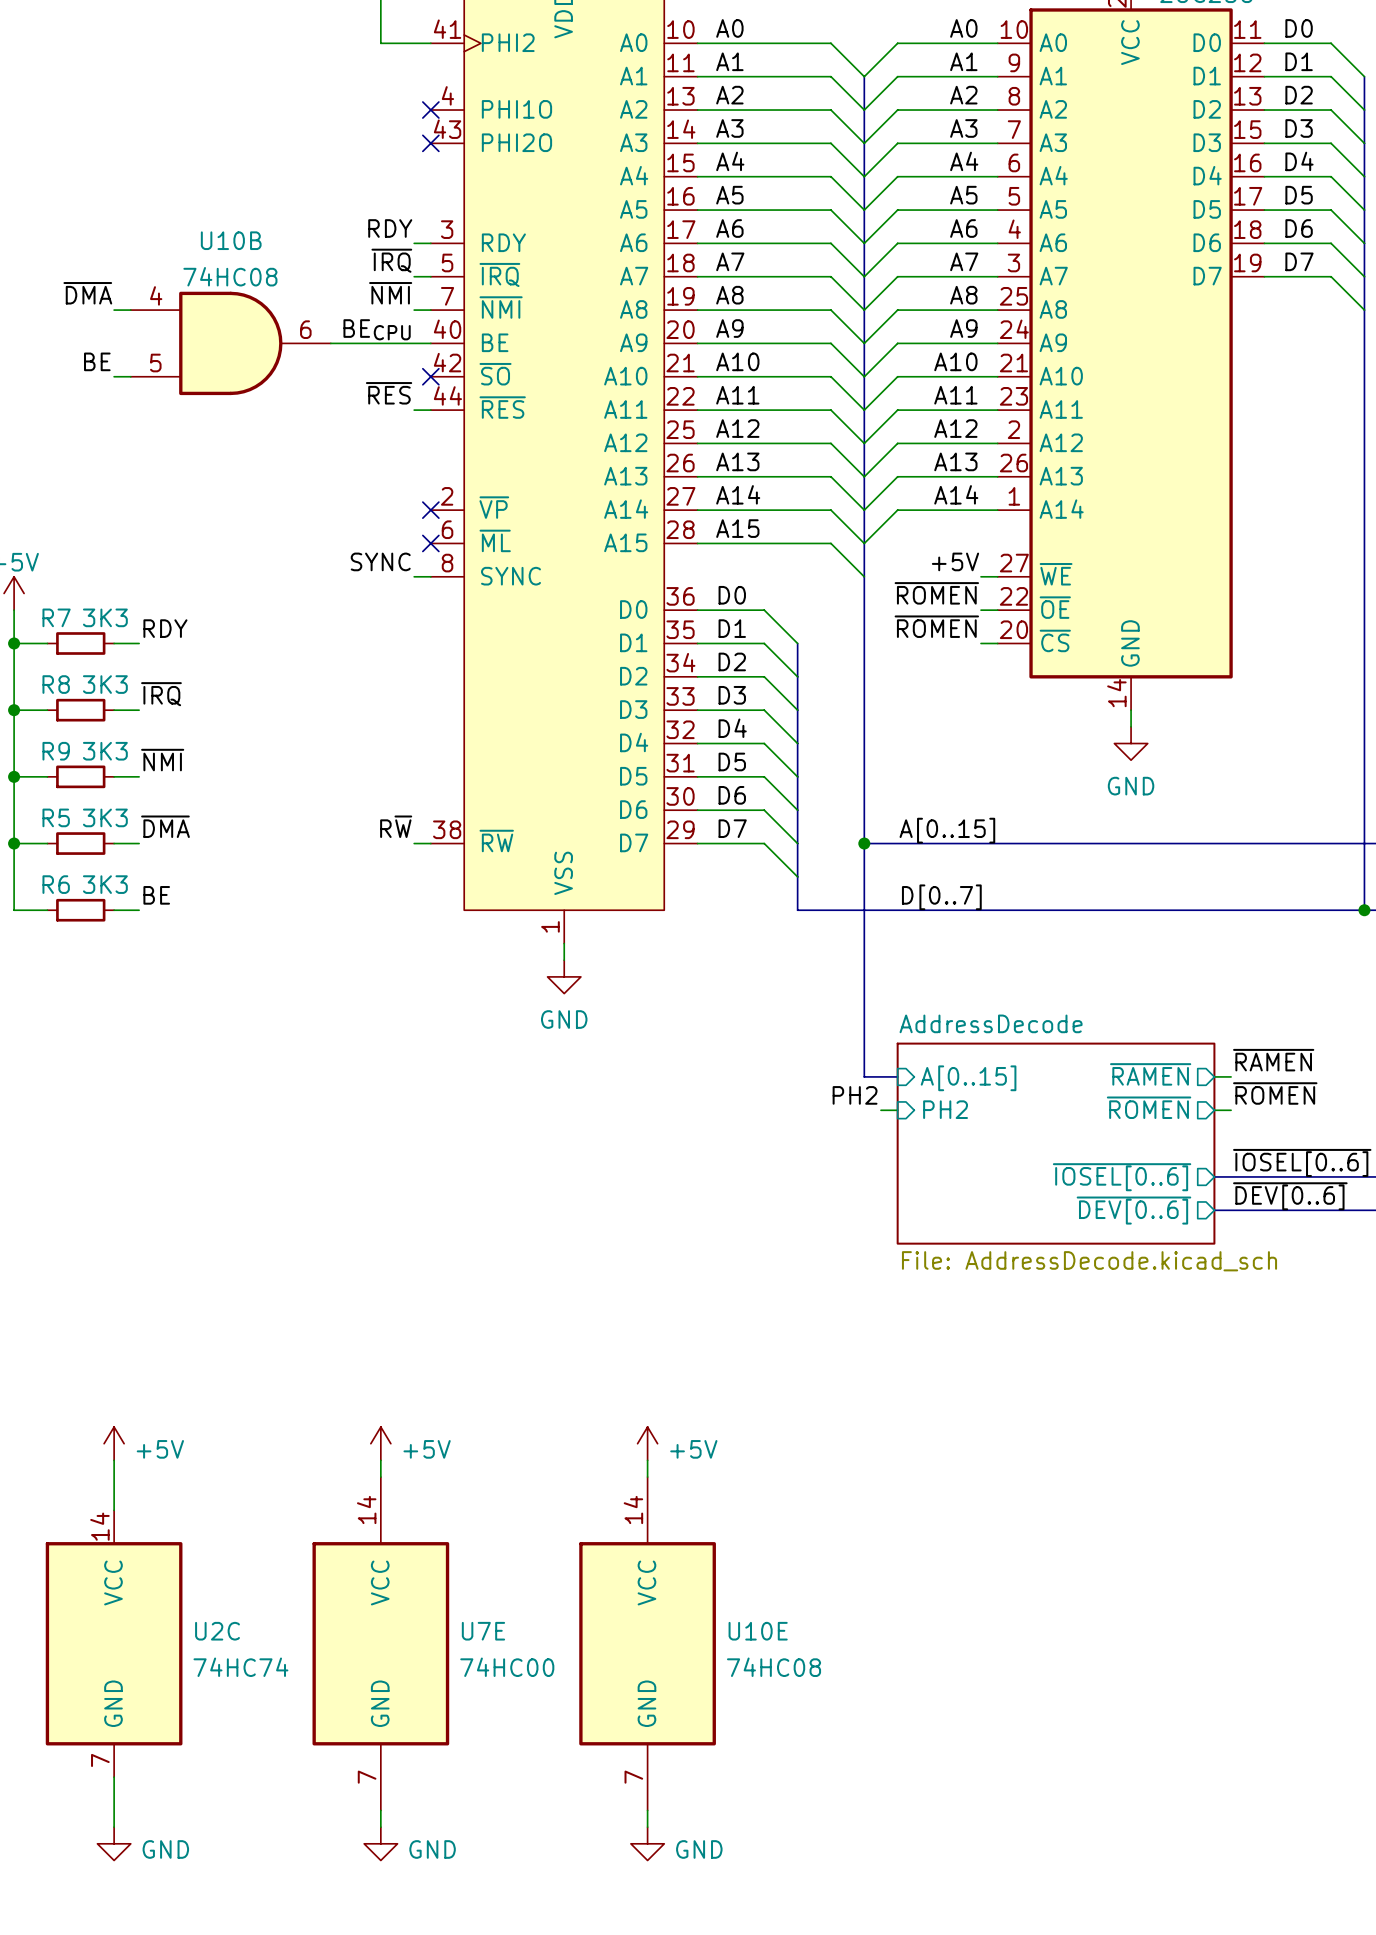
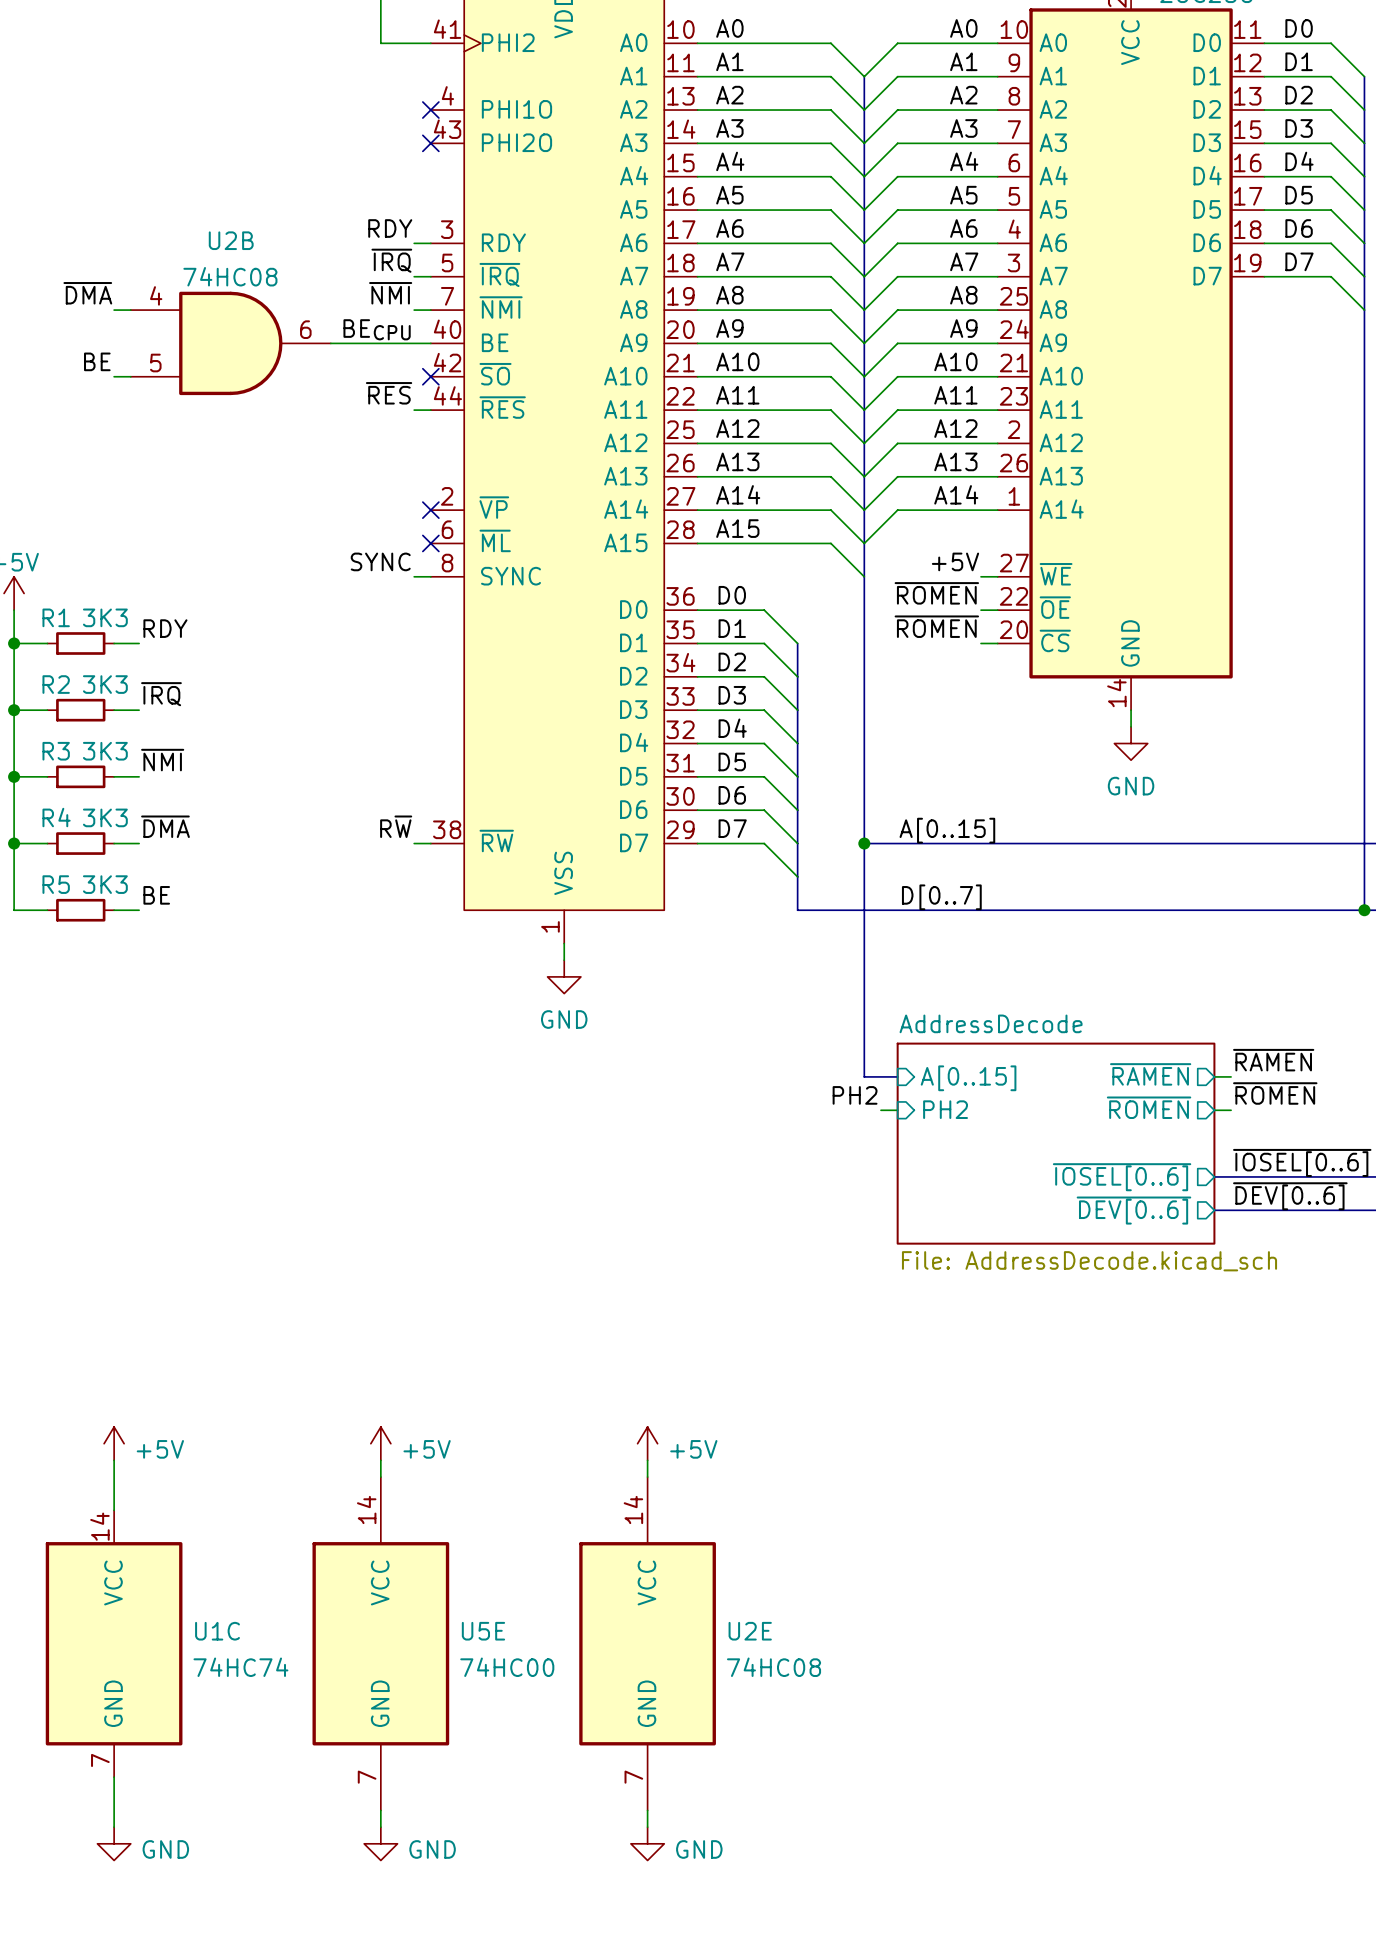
U10B name: U10B (231, 240) -> U2B (231, 240)
R7 name: R7 (56, 617) -> R1 (56, 617)
R8 name: R8 (56, 684) -> R2 (56, 684)
R9 name: R9 (56, 751) -> R3 (56, 751)
R5 name: R5 (56, 817) -> R4 (56, 817)
R6 name: R6 (56, 884) -> R5 (56, 884)
U2C name: U2C (217, 1631) -> U1C (217, 1631)
U7E name: U7E (483, 1631) -> U5E (483, 1631)
U10E name: U10E (758, 1631) -> U2E (750, 1631)

